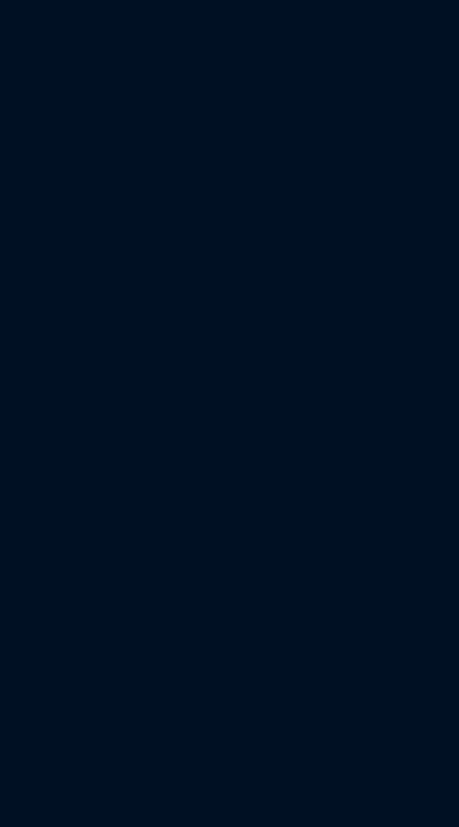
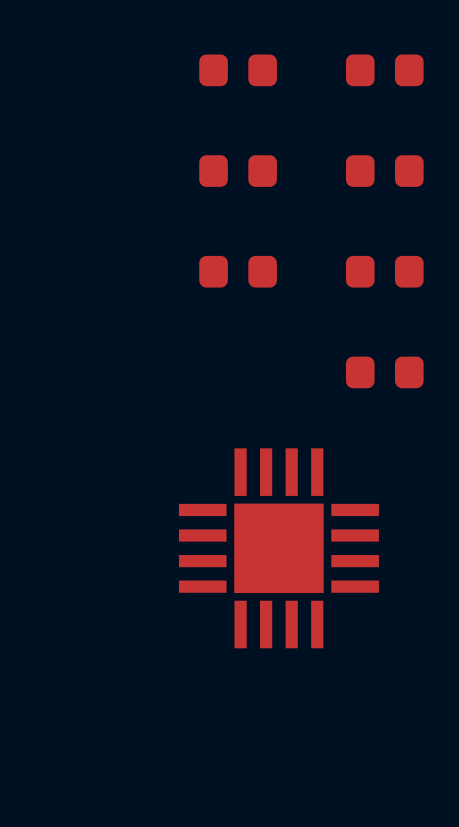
part: none -> (238, 70)
part: none -> (384, 70)
part: none -> (238, 171)
part: none -> (384, 171)
part: none -> (238, 271)
part: none -> (384, 271)
part: none -> (384, 372)
part: none -> (278, 548)

